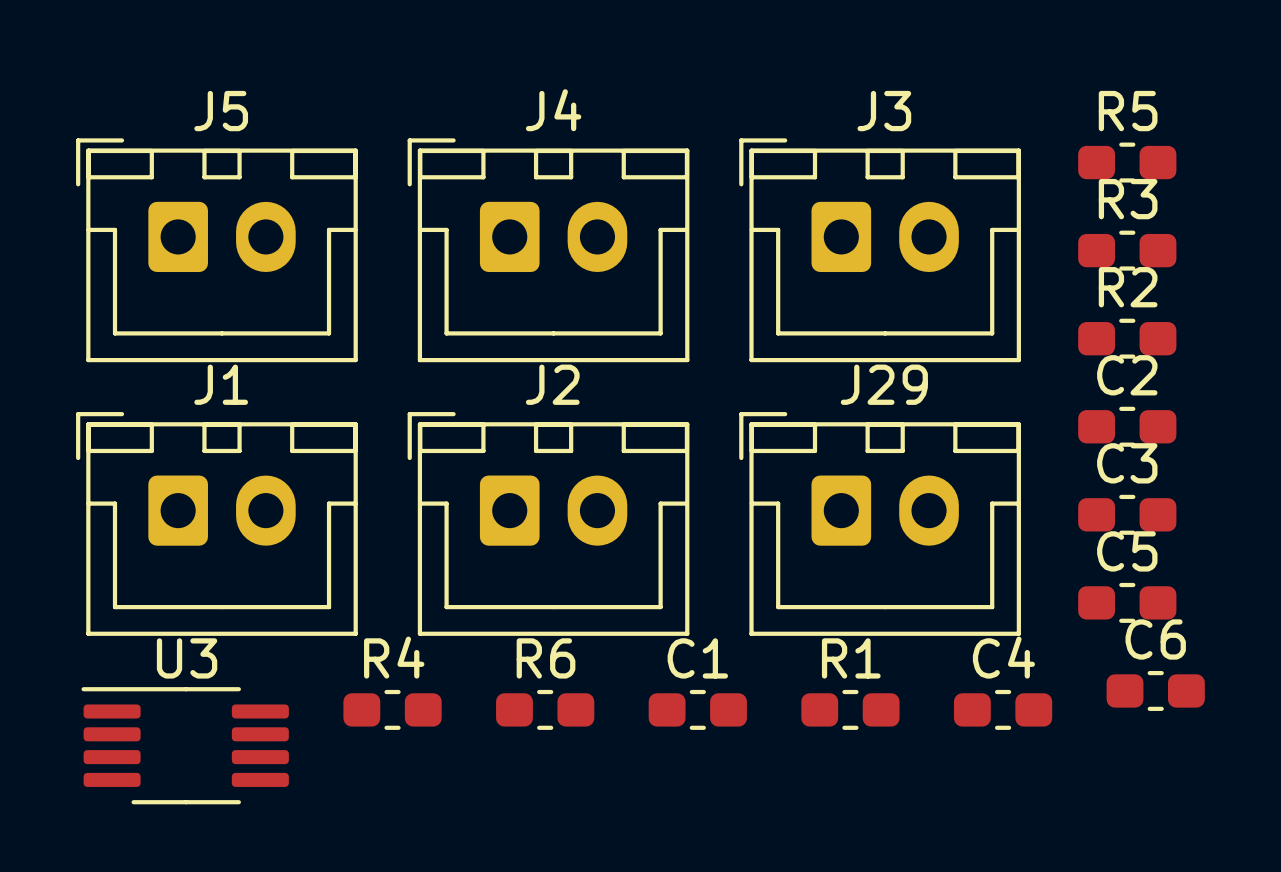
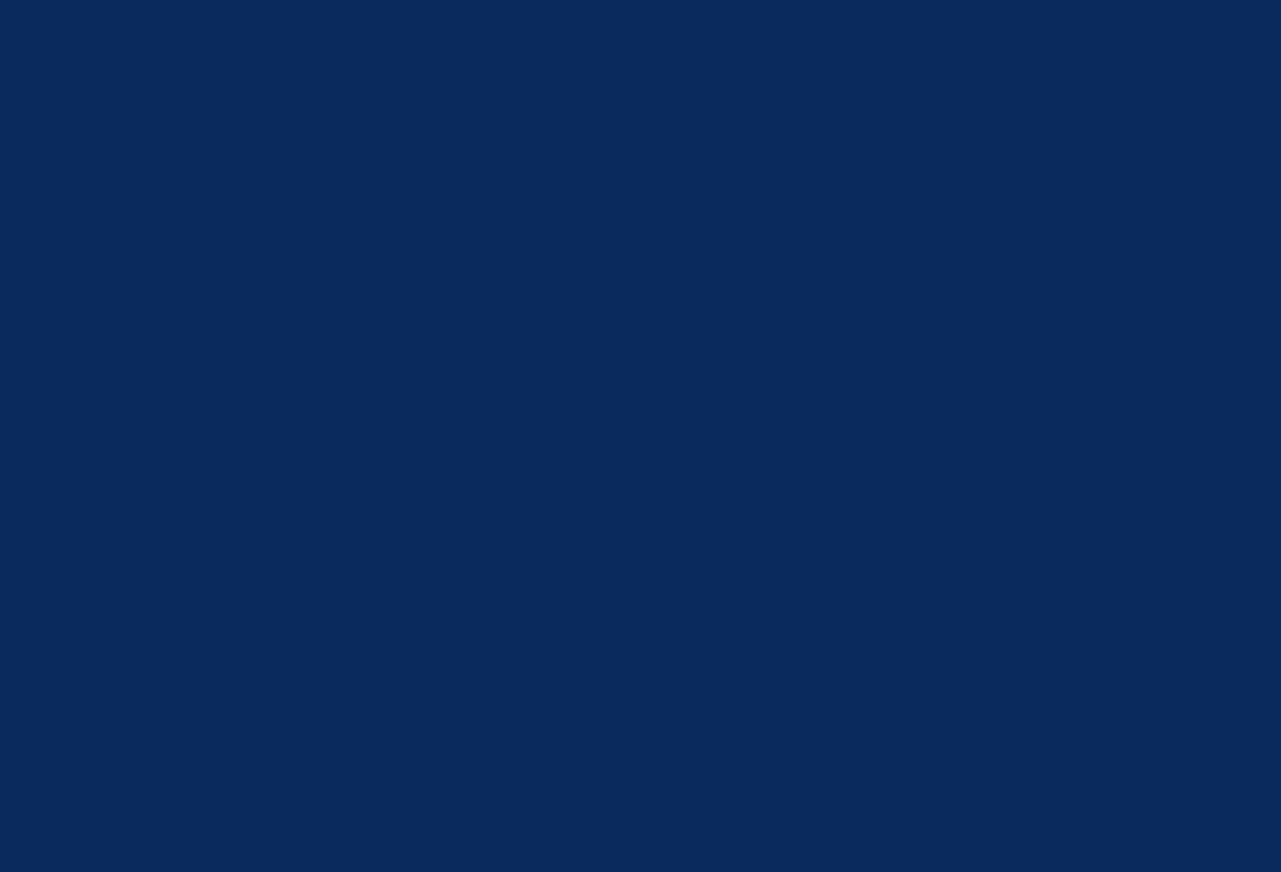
R5: (1127, 162) -> none
J5: (216, 250) -> none
J4: (548, 250) -> none
J3: (880, 250) -> none
R3: (1127, 250) -> none
R2: (1127, 338) -> none
C2: (1127, 426) -> none
C3: (1127, 514) -> none
J1: (216, 523) -> none
J2: (548, 523) -> none
J29: (880, 523) -> none
C5: (1127, 602) -> none
C6: (1155, 690) -> none
R4: (392, 709) -> none
R6: (545, 709) -> none
C1: (697, 709) -> none
R1: (850, 709) -> none
C4: (1003, 709) -> none
U3: (185, 745) -> none

